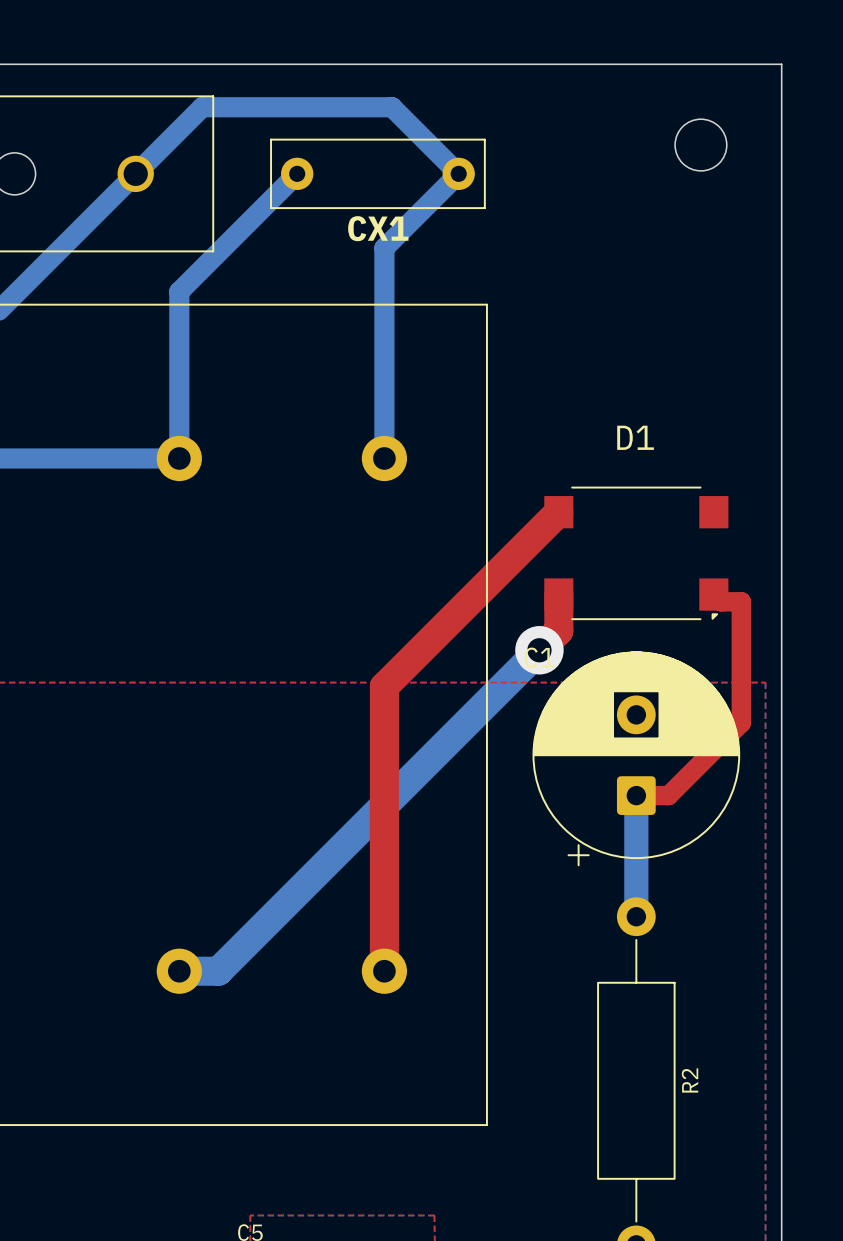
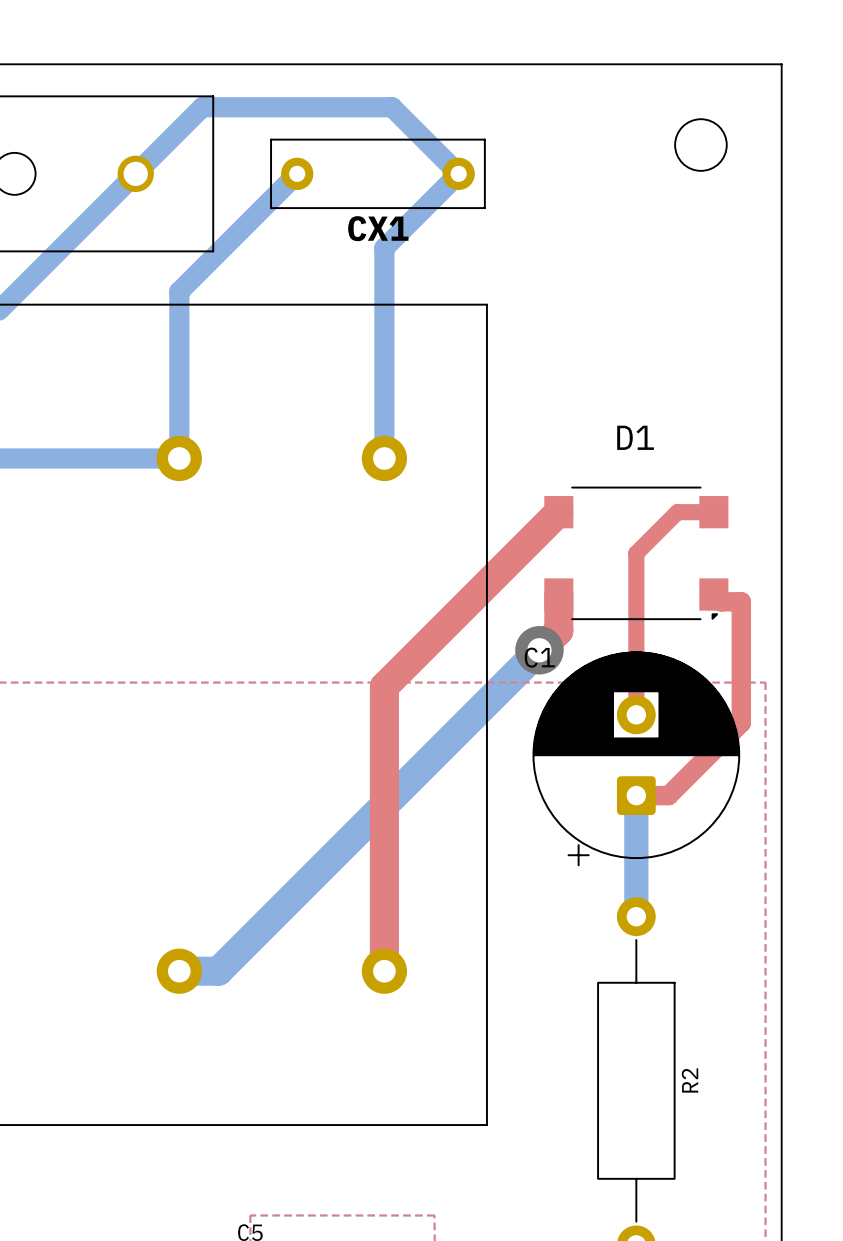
top track: none -> (713, 512) (677, 512) (636, 553) (636, 714)

